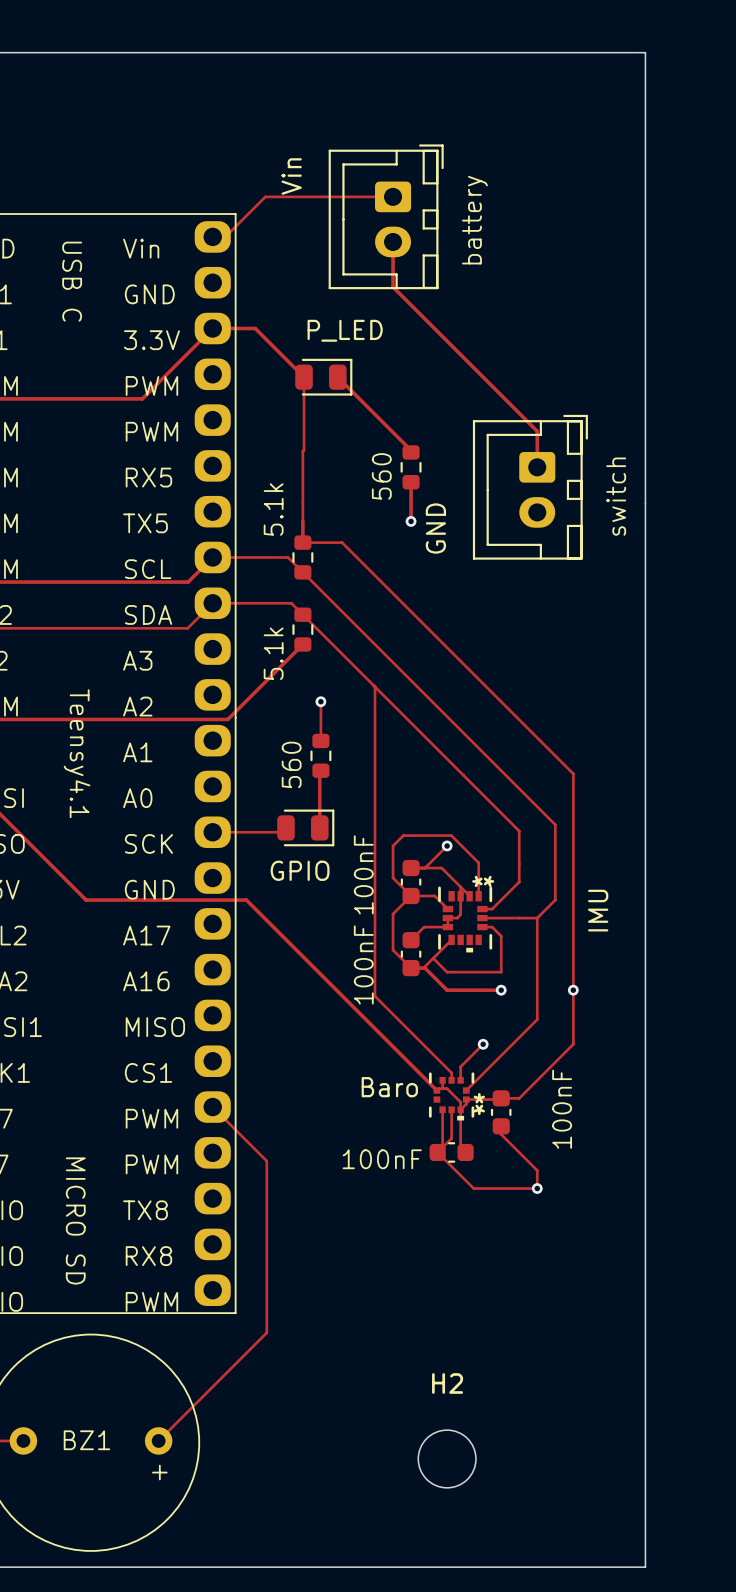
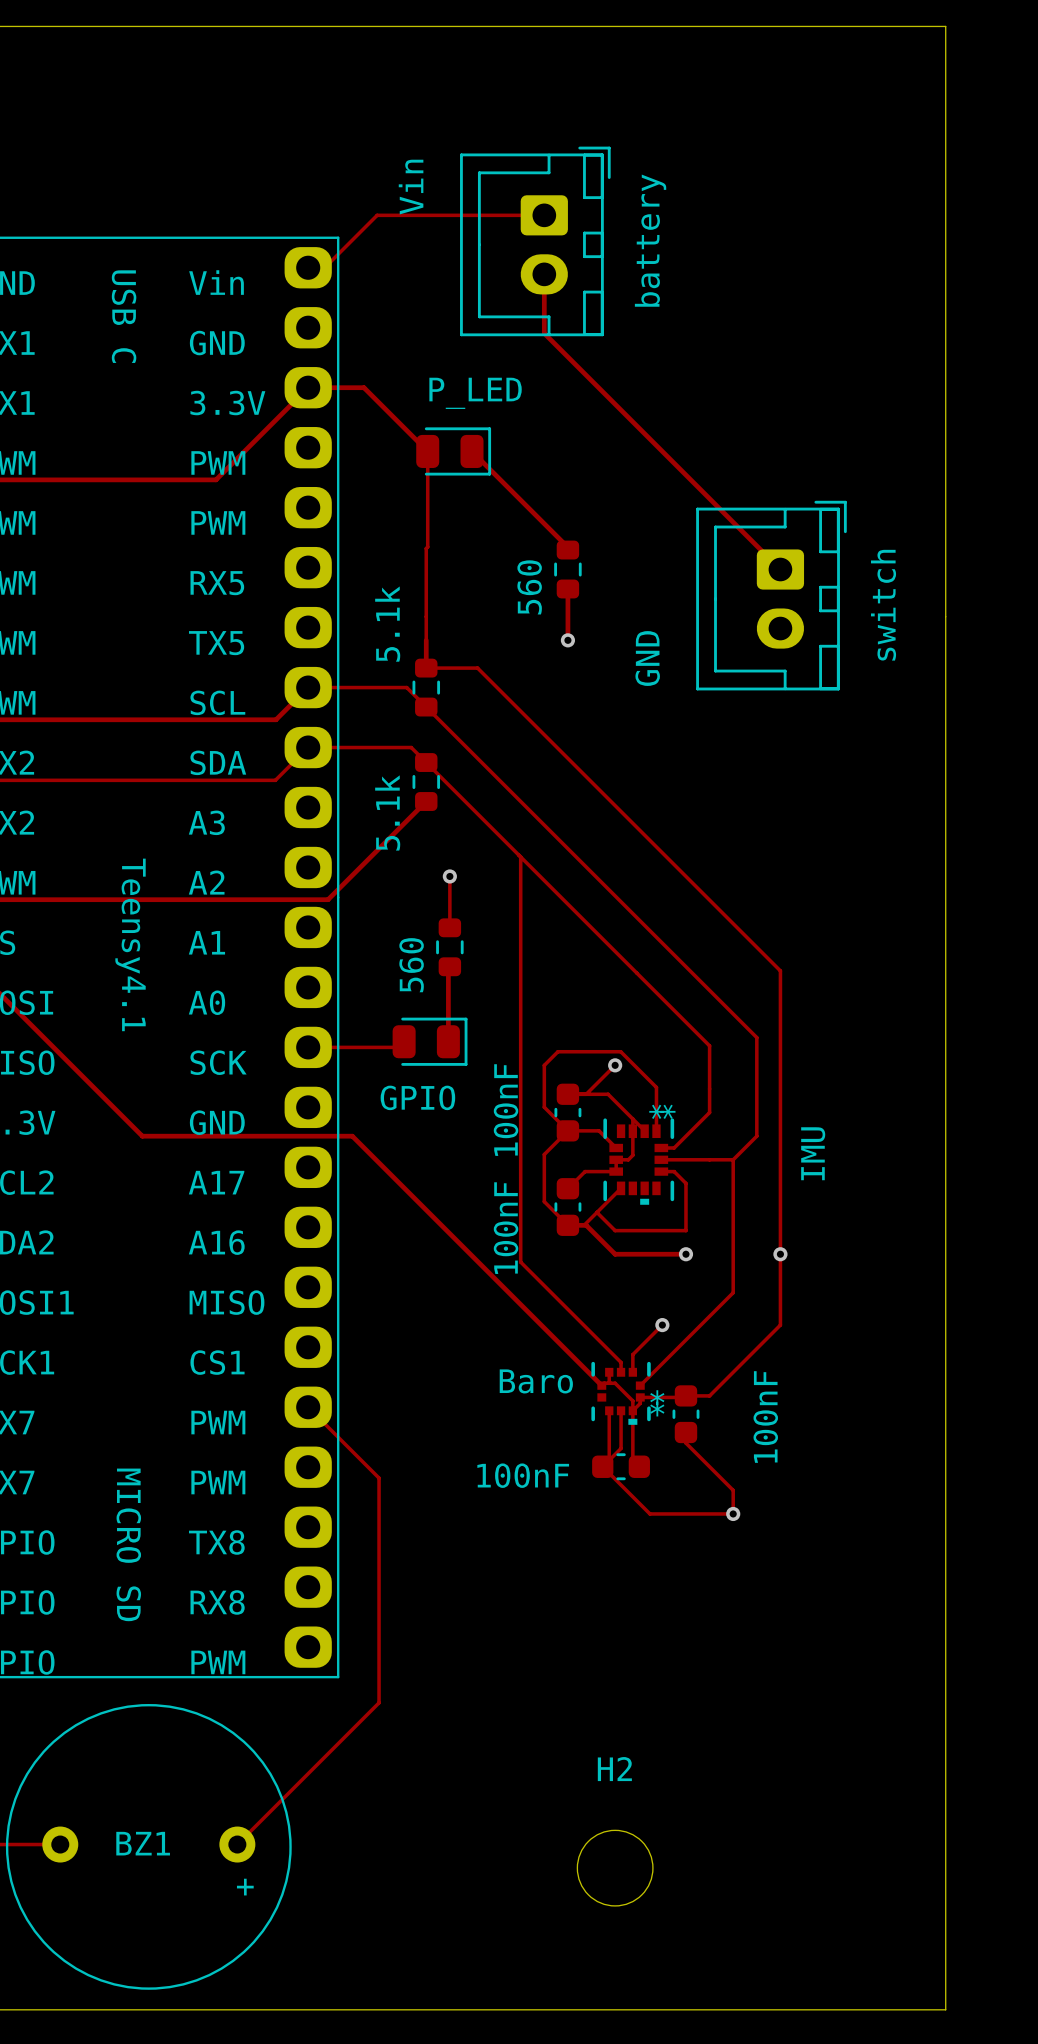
board edge: (645, 52) (645, 1567) -> (874, 26) (945, 26) (945, 2009) (874, 2009)
track: (537, 431) (537, 467) -> (733, 522) (780, 569)
part position: (530, 487) -> (771, 595)
text position: switch (616, 496) -> switch (883, 605)
text position: GND (435, 528) -> GND (647, 658)

